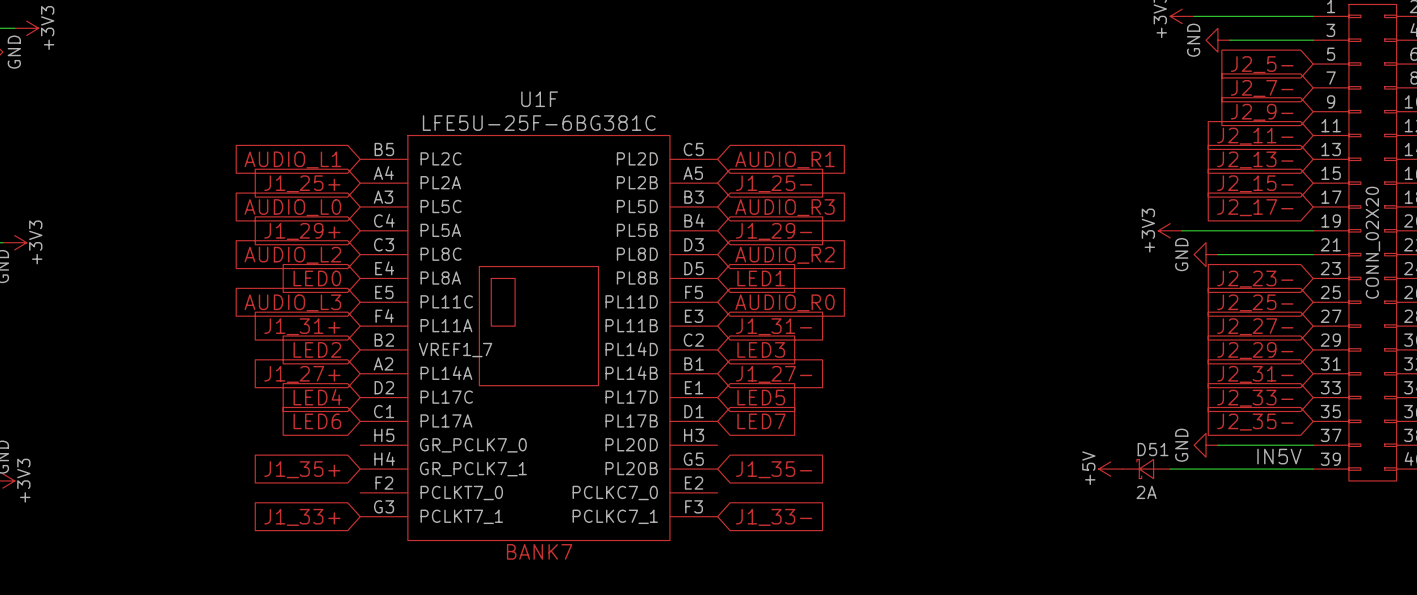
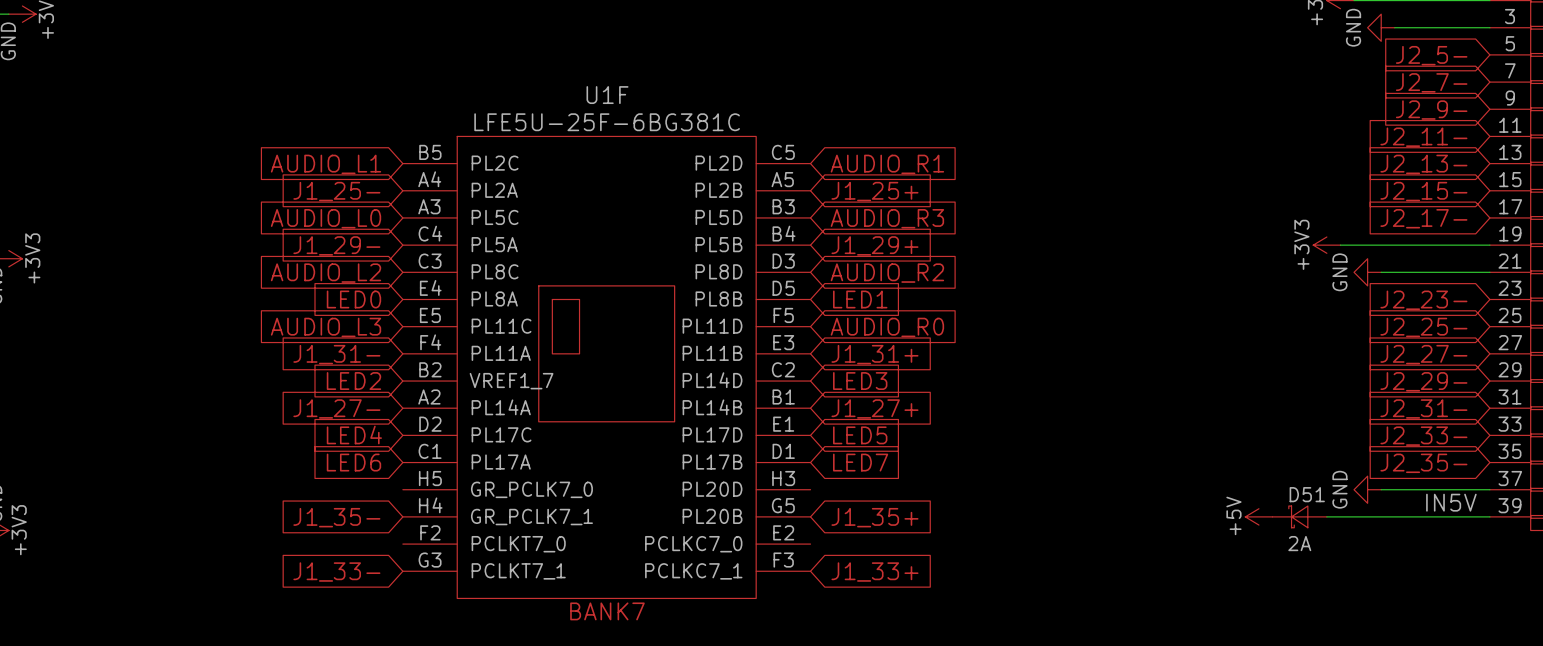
global label: J1_25+ (302, 183) -> J1_25- (336, 191)
global label: J1_25- (774, 183) -> J1_25+ (874, 191)
global label: J1_29+ (302, 231) -> J1_29- (336, 245)
global label: J1_29- (774, 231) -> J1_29+ (874, 245)
global label: J1_31+ (302, 326) -> J1_31- (336, 354)
global label: J1_31- (774, 326) -> J1_31+ (874, 354)
global label: J1_27+ (302, 374) -> J1_27- (336, 408)
global label: J1_27- (774, 374) -> J1_27+ (874, 408)
global label: J1_35+ (302, 469) -> J1_35- (336, 517)
global label: J1_35- (774, 469) -> J1_35+ (874, 517)
global label: J1_33+ (302, 517) -> J1_33- (336, 572)
global label: J1_33- (774, 517) -> J1_33+ (874, 572)

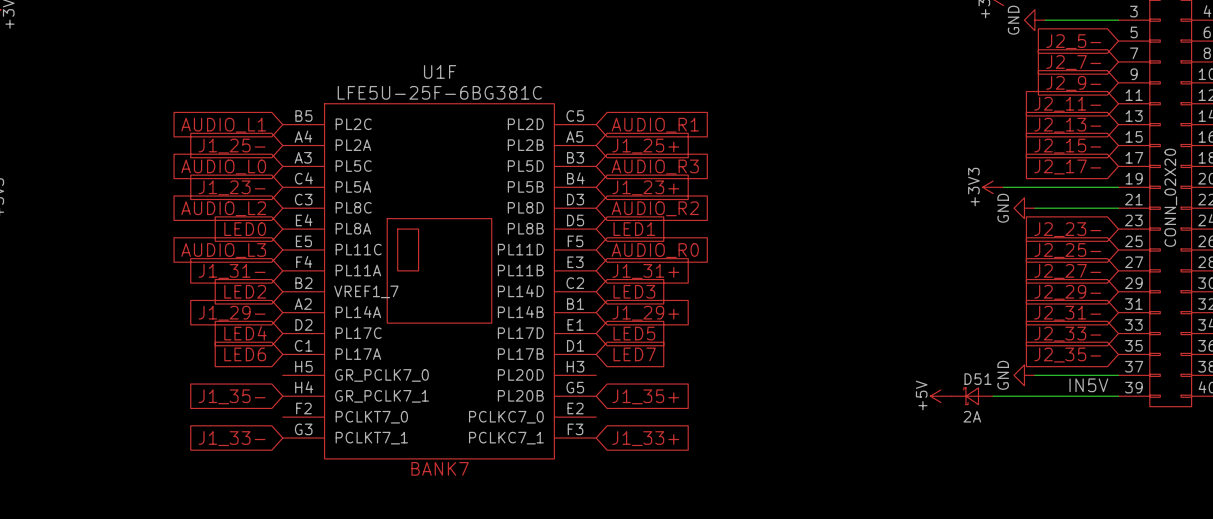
global label: J1_29- (336, 245) -> J1_23- (232, 187)
global label: J1_29+ (874, 245) -> J1_23+ (645, 187)
global label: J1_27- (336, 408) -> J1_29- (232, 313)
global label: J1_27+ (874, 408) -> J1_29+ (645, 313)

